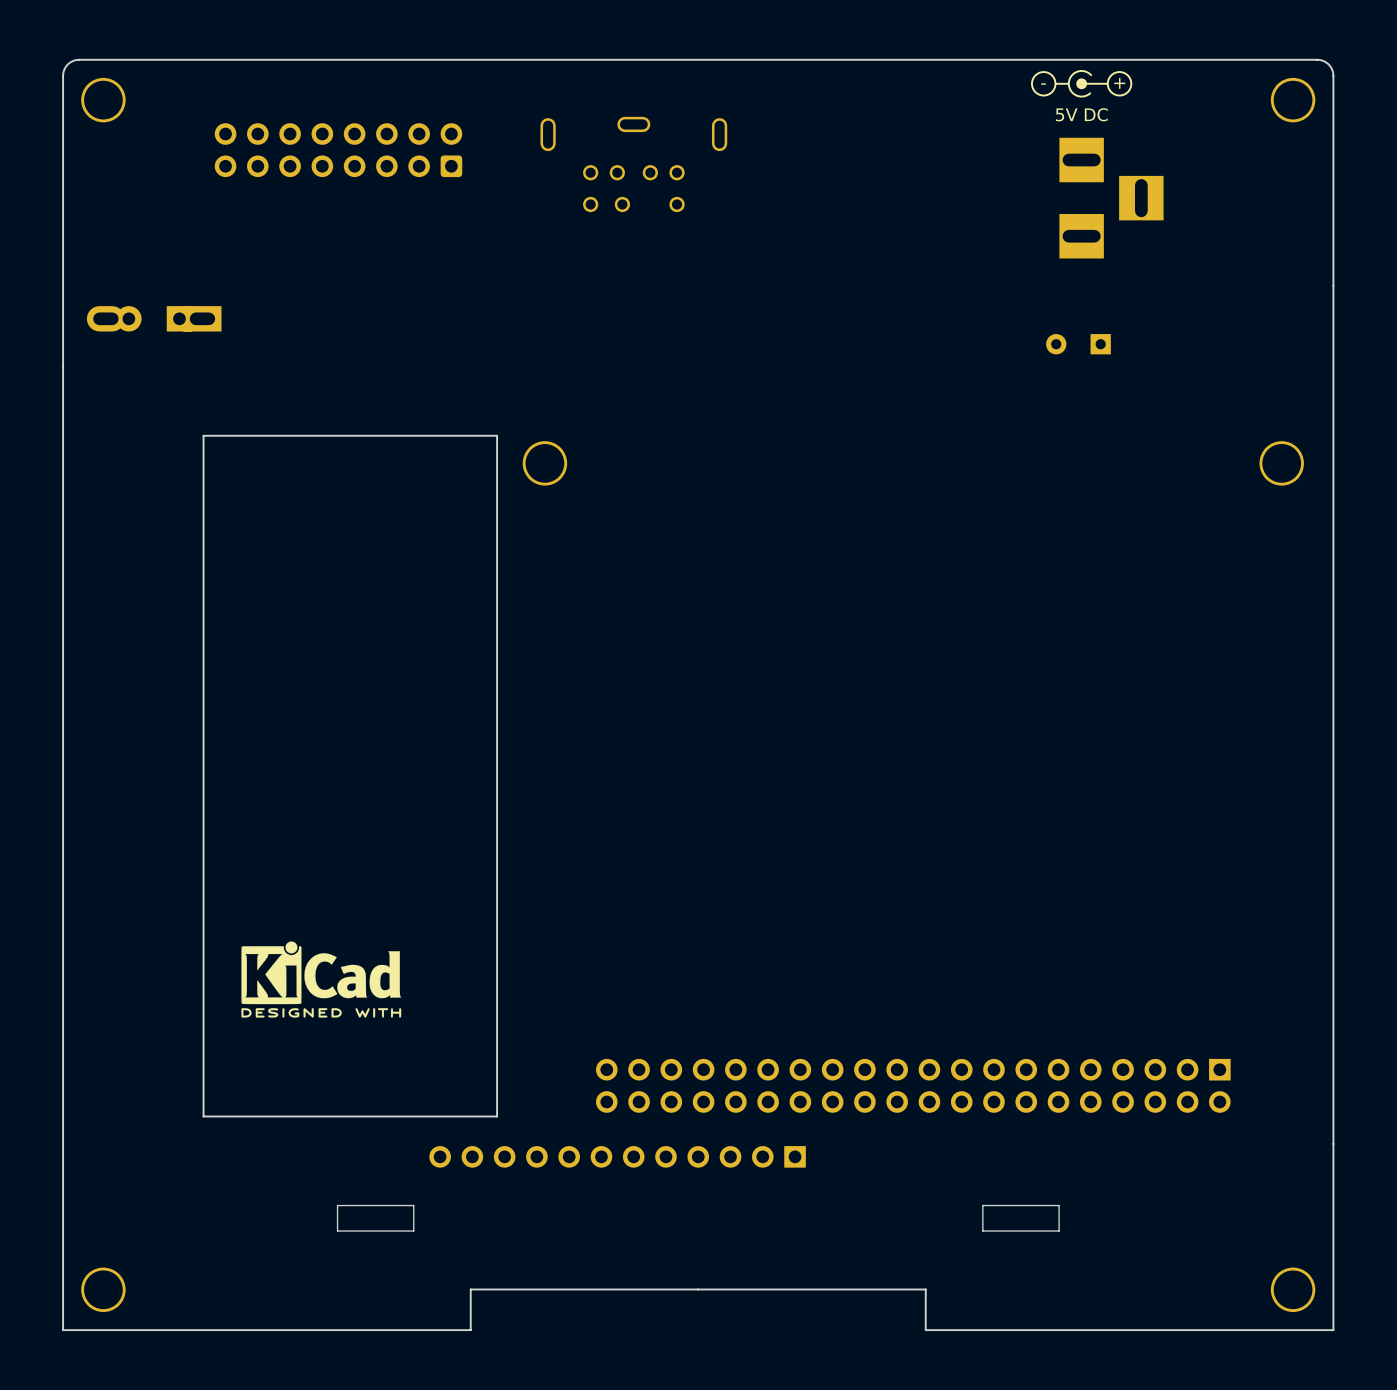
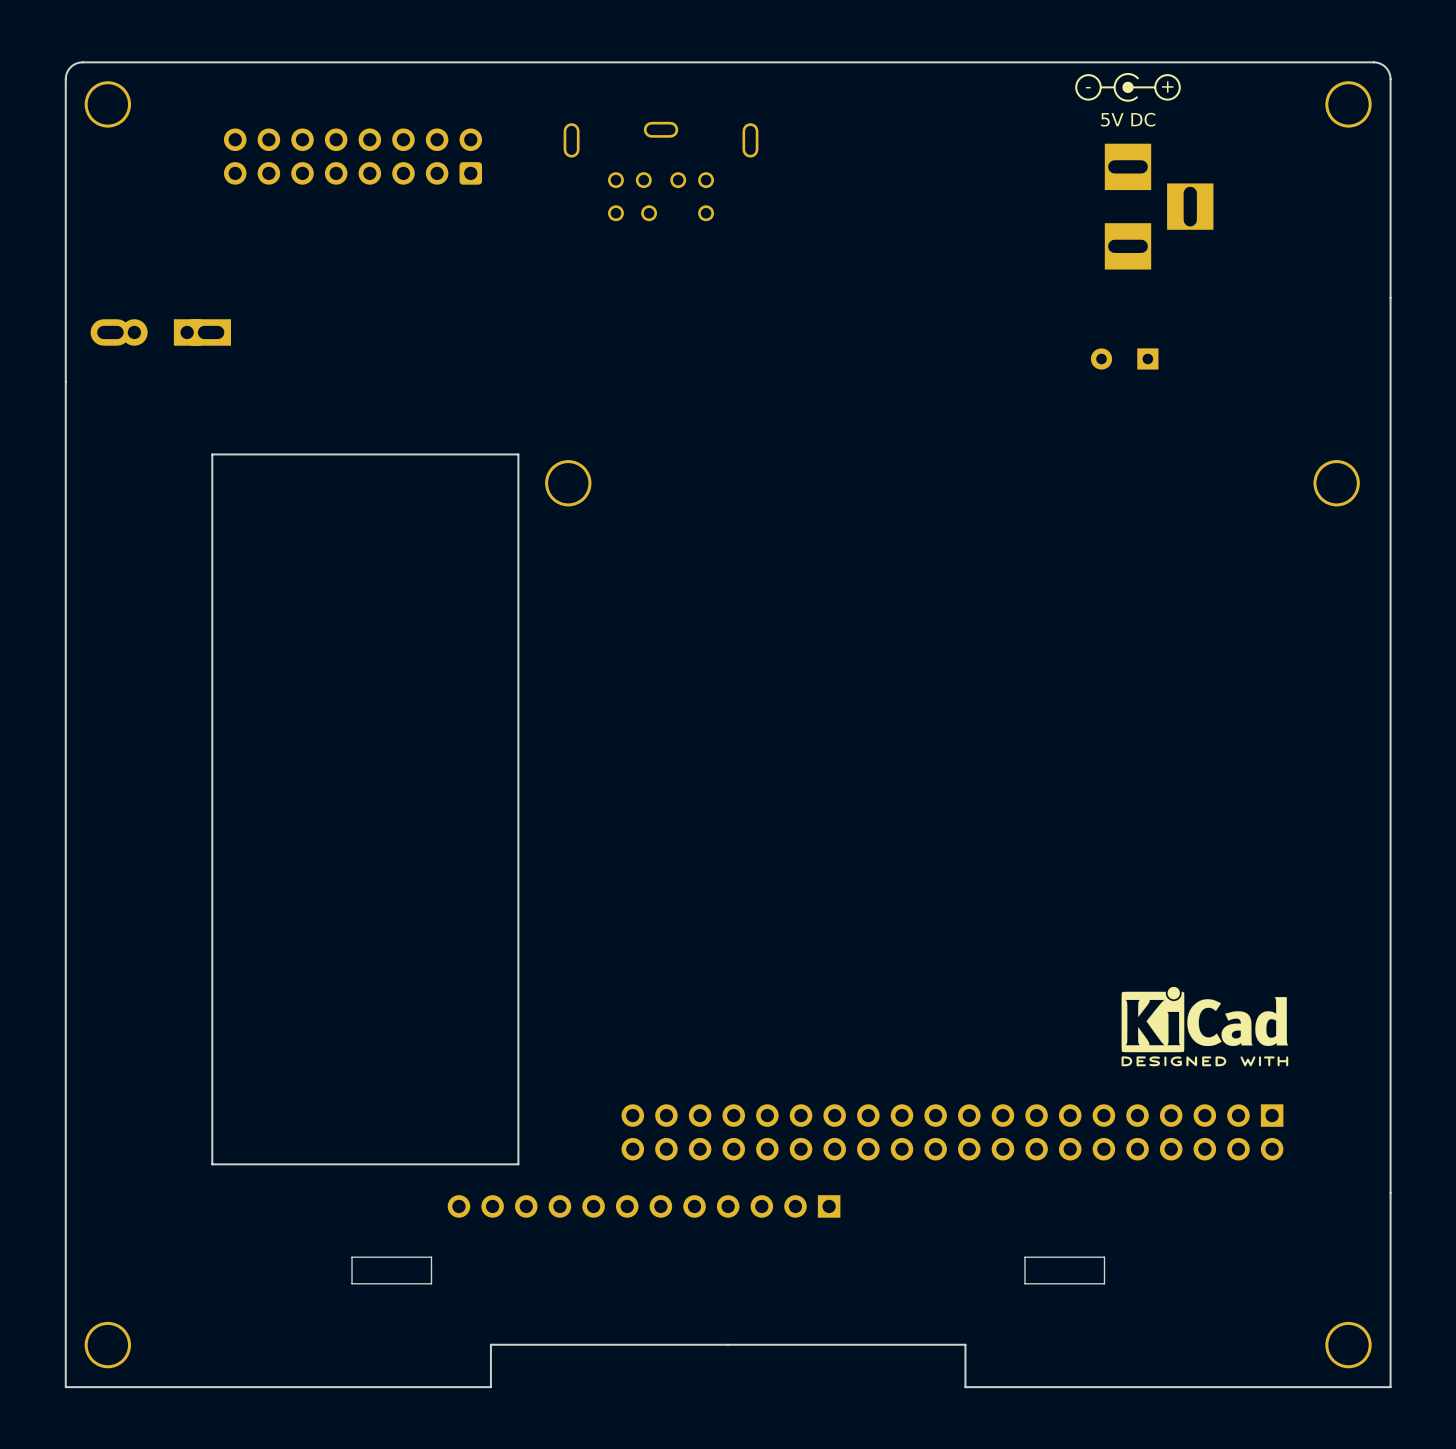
drawing: [241, 941, 402, 1018] -> none
drawing: none -> [1121, 986, 1289, 1067]

